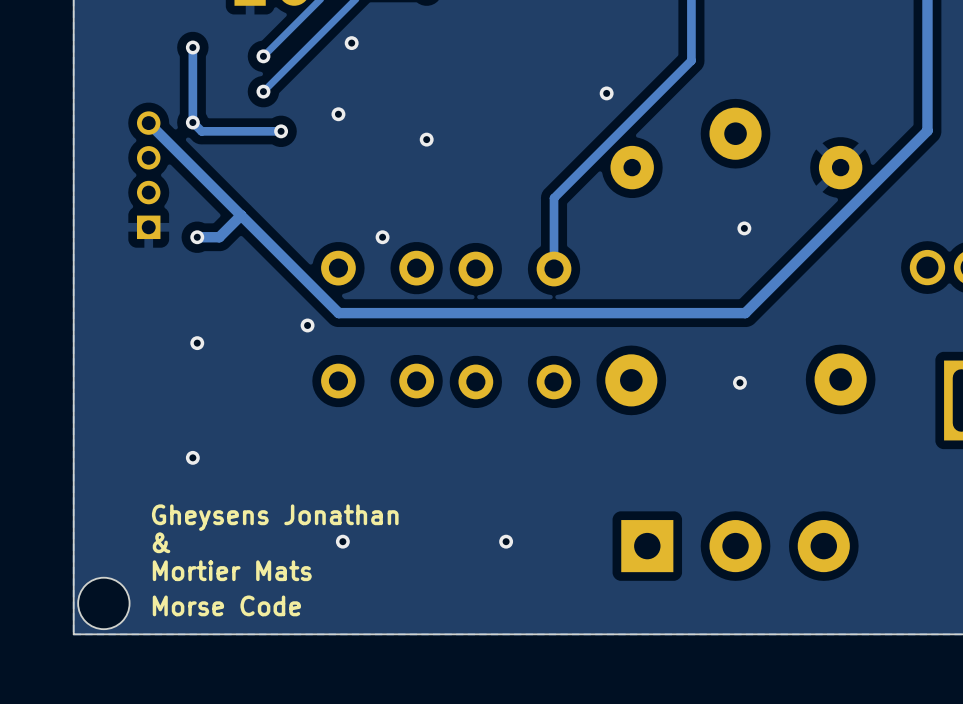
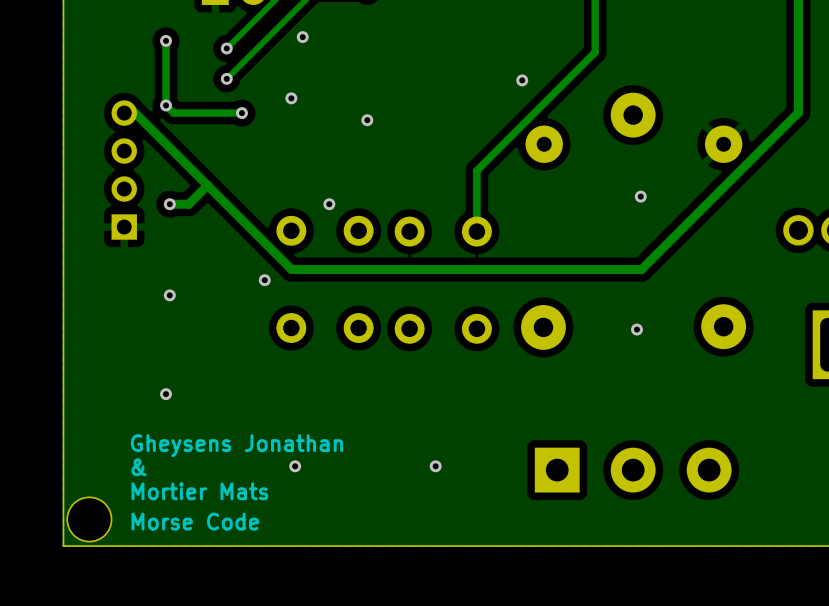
part: (148, 175) -> none
part: none -> (124, 170)

